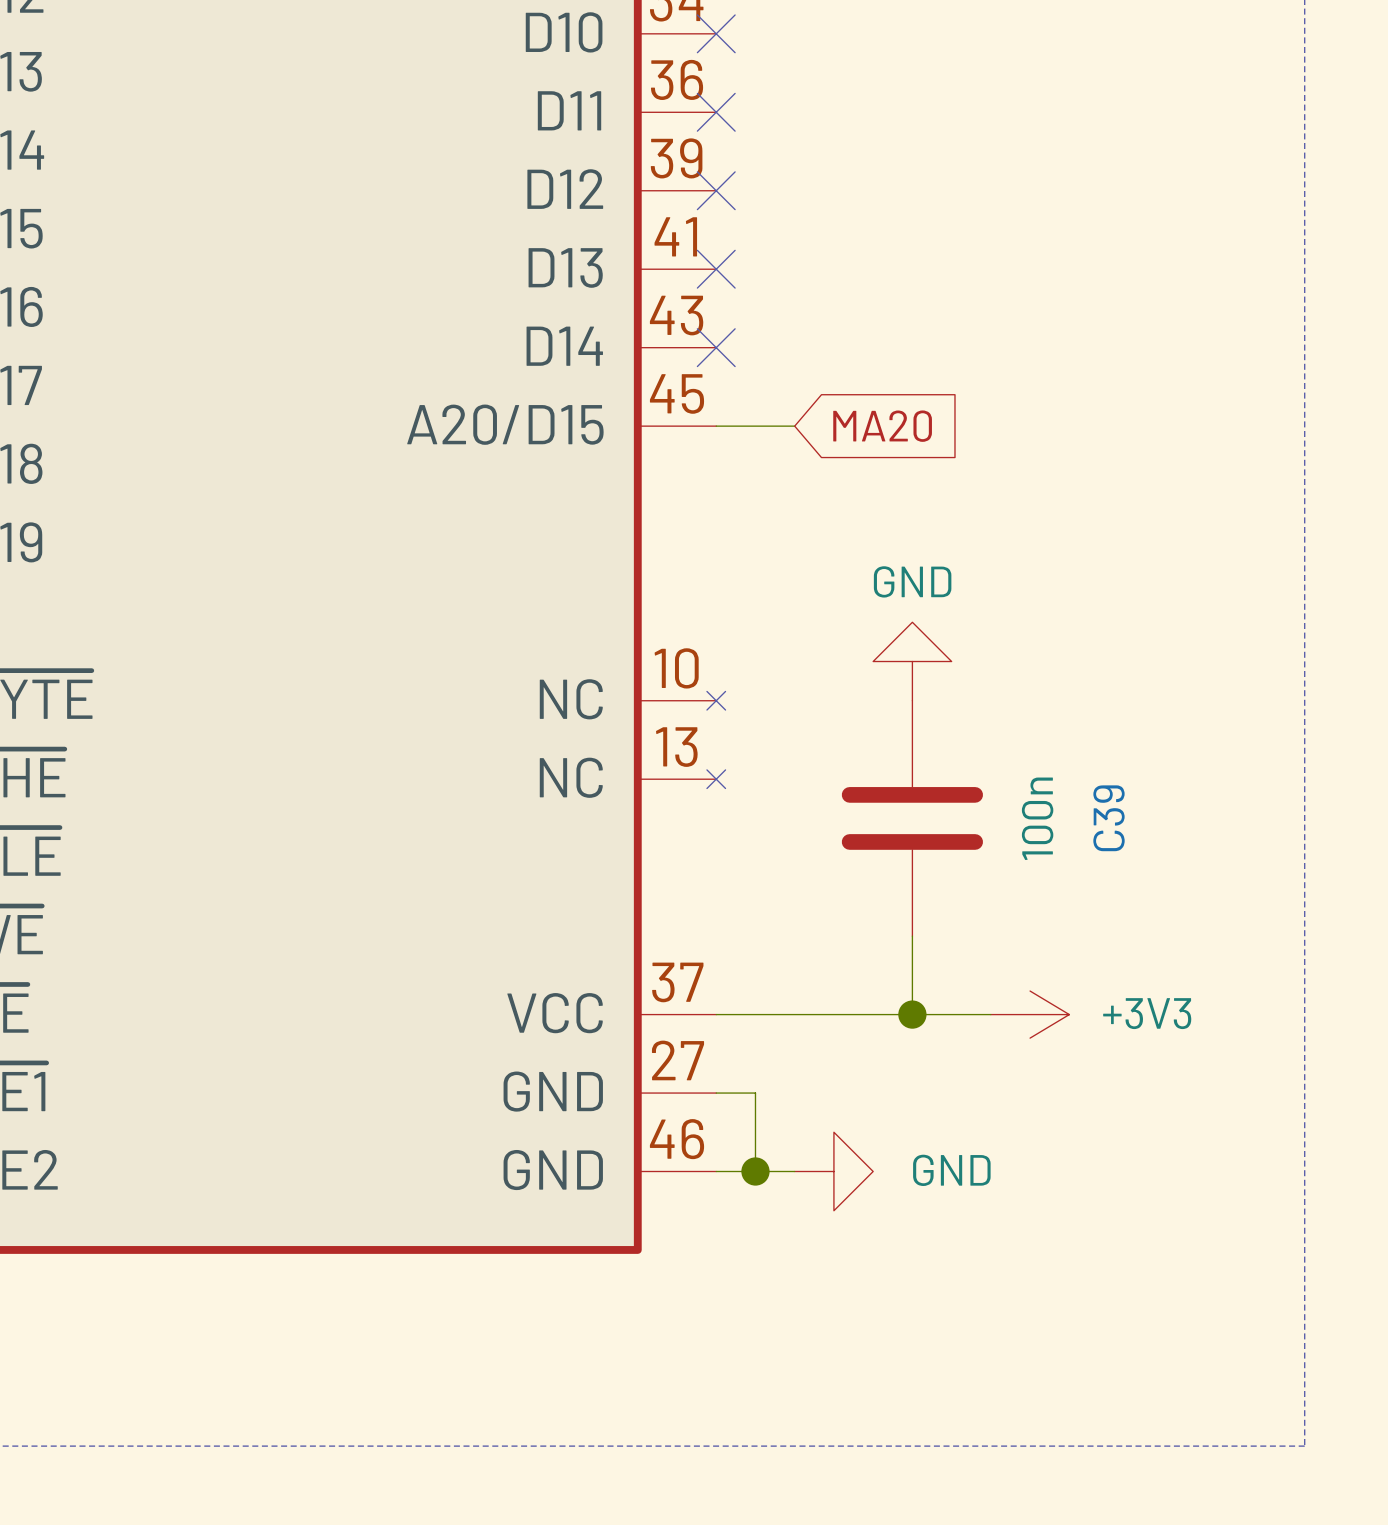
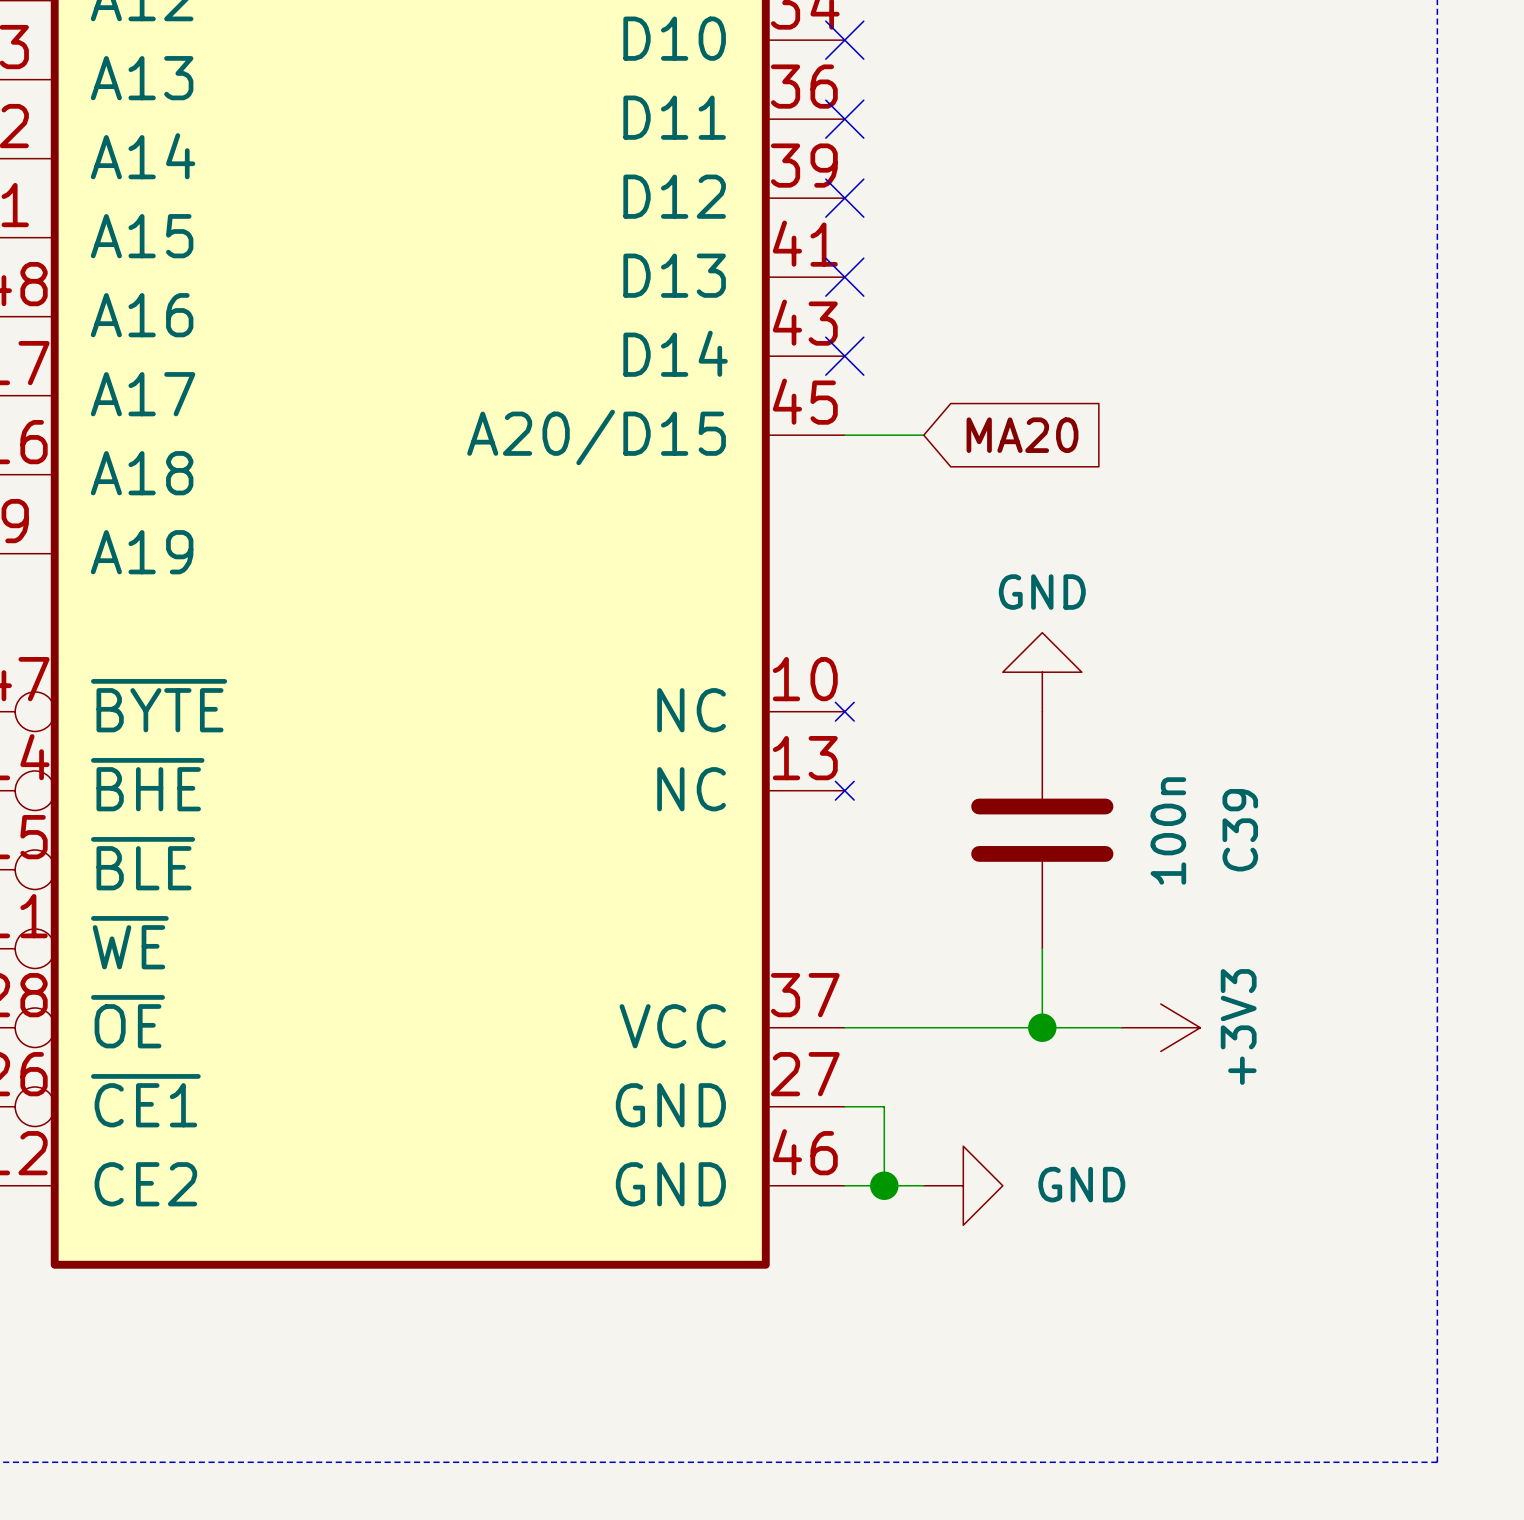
power symbol text rotation: 0° (1147, 1013) -> 90° counterclockwise (1238, 1027)

